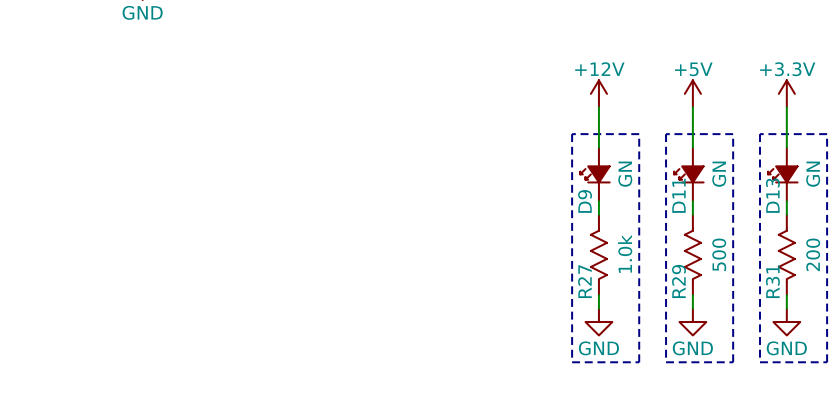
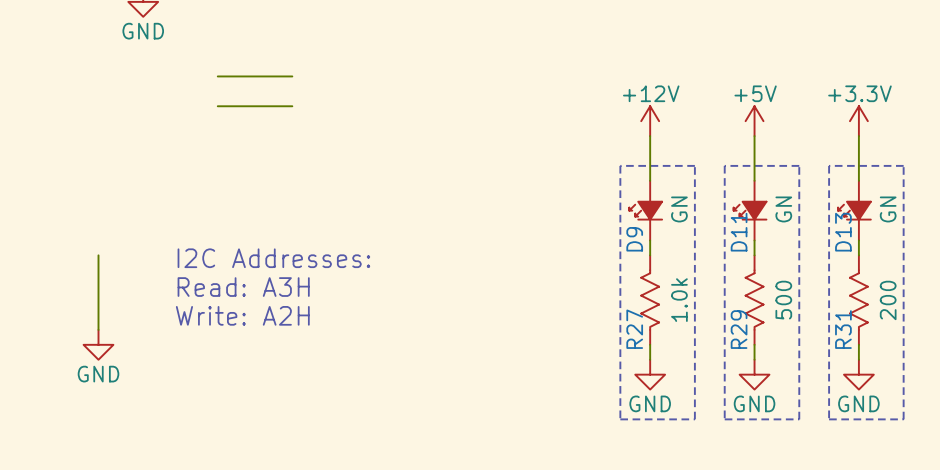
wire: none -> (217, 76) (292, 76)
wire: none -> (217, 106) (292, 106)
wire: none -> (98, 255) (98, 329)
text: none -> I2C Addresses: (273, 258)
text: none -> Read: A3H (243, 287)
text: none -> Write: A2H (242, 315)
power symbol: none -> GND (98, 344)

